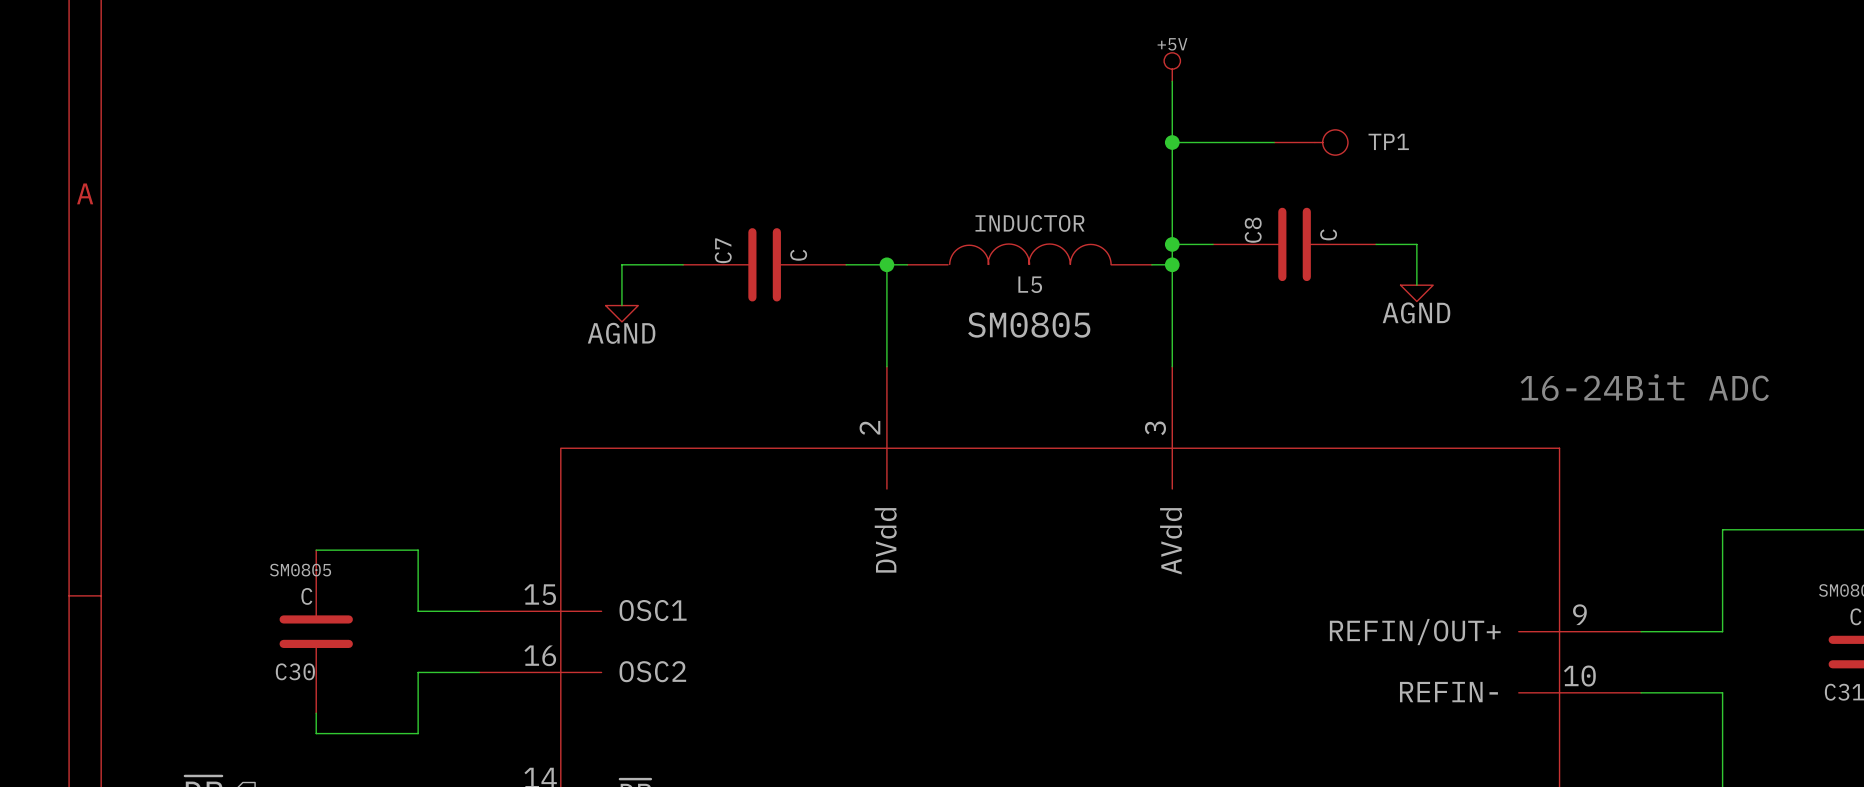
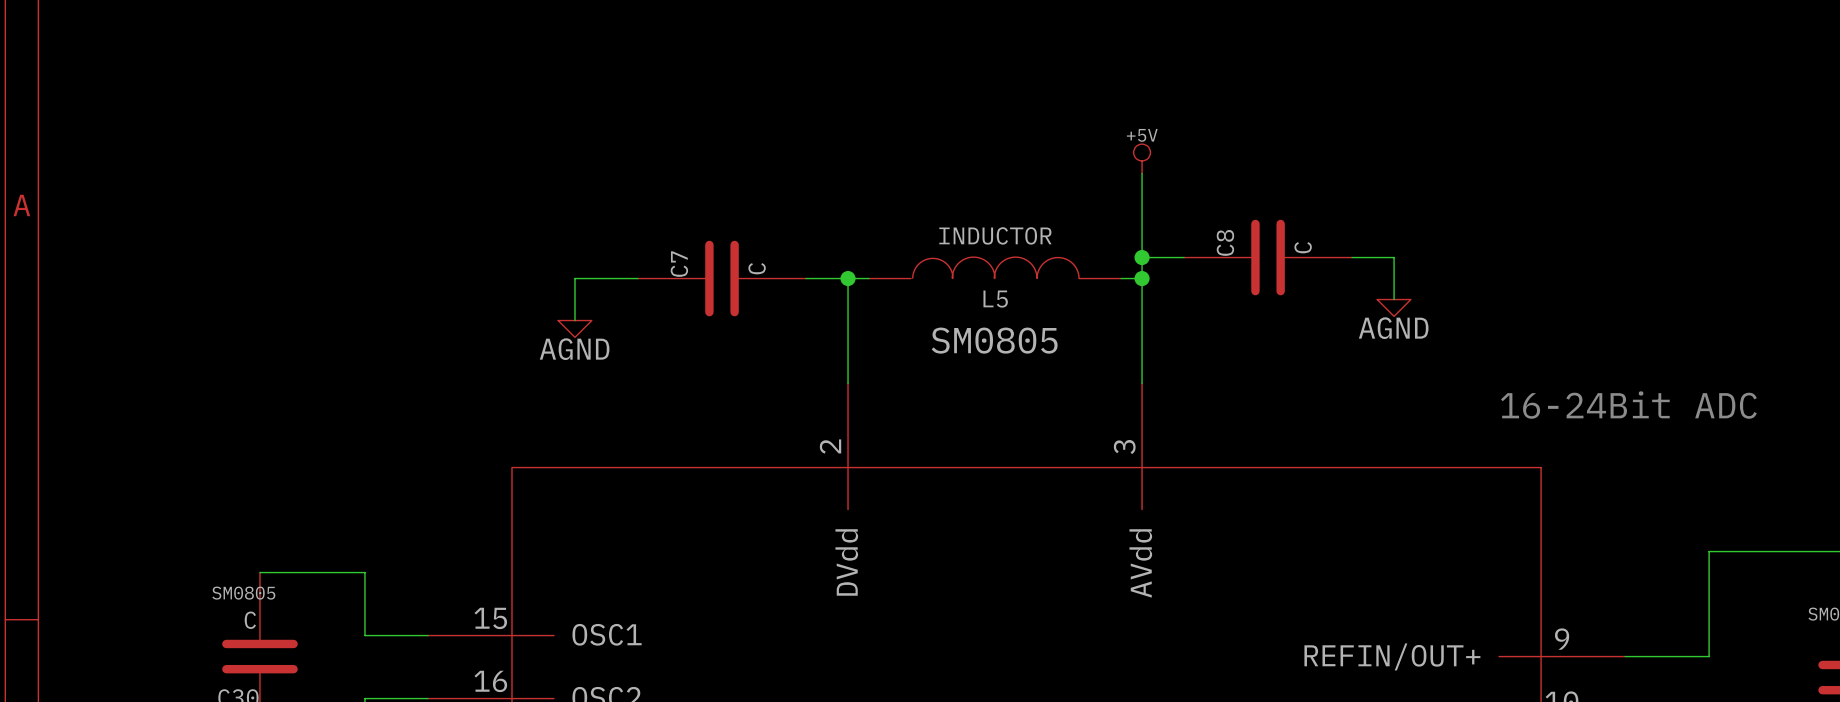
power symbol position: +5V (1172, 67) -> +5V (1142, 158)
wire: (1172, 81) (1172, 162) -> none
wire: (1172, 142) (1274, 142) -> none
junction: (1172, 142) -> none
TP1: (1311, 142) -> none

